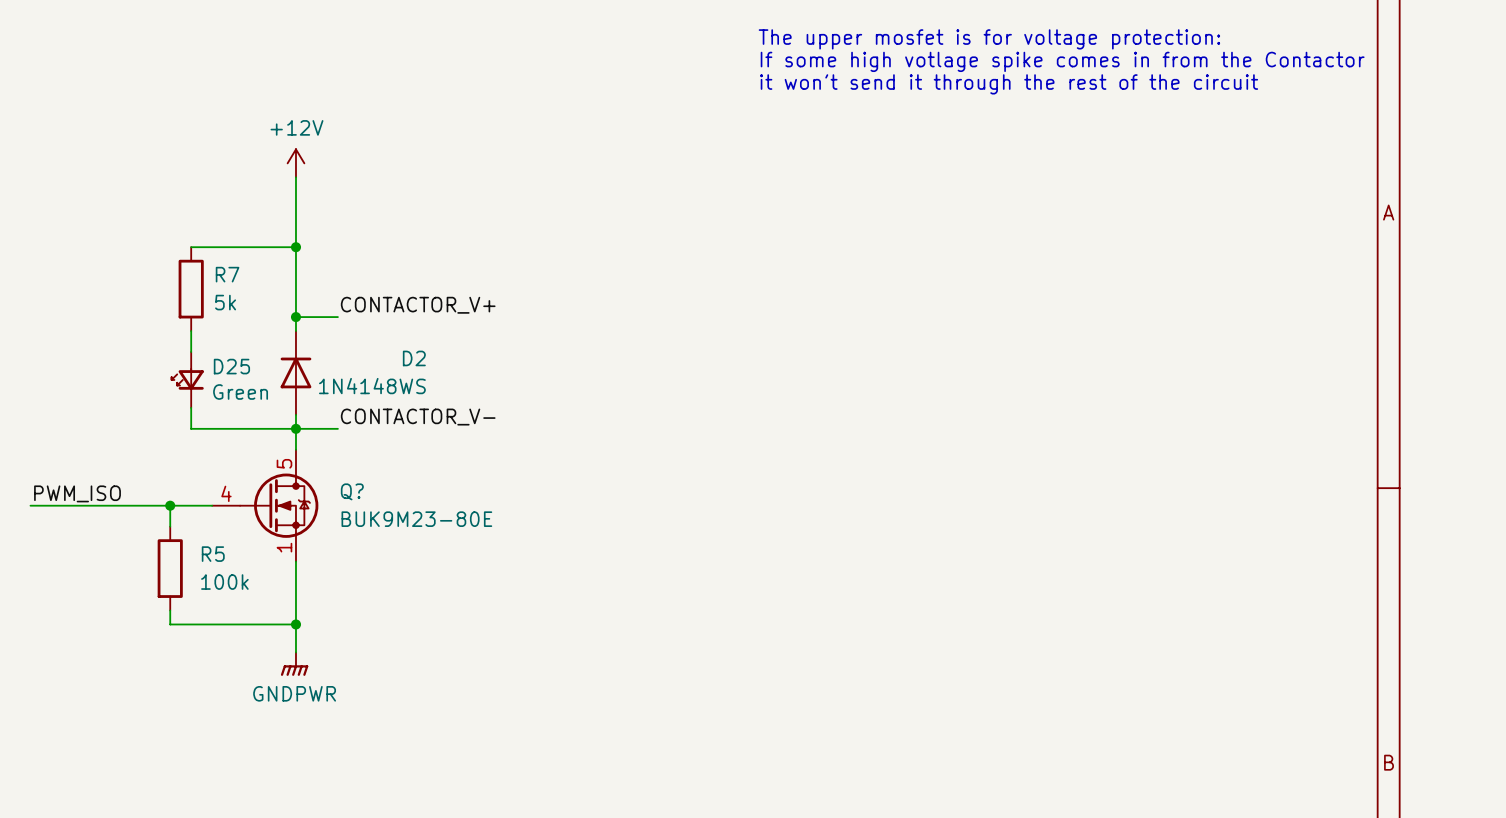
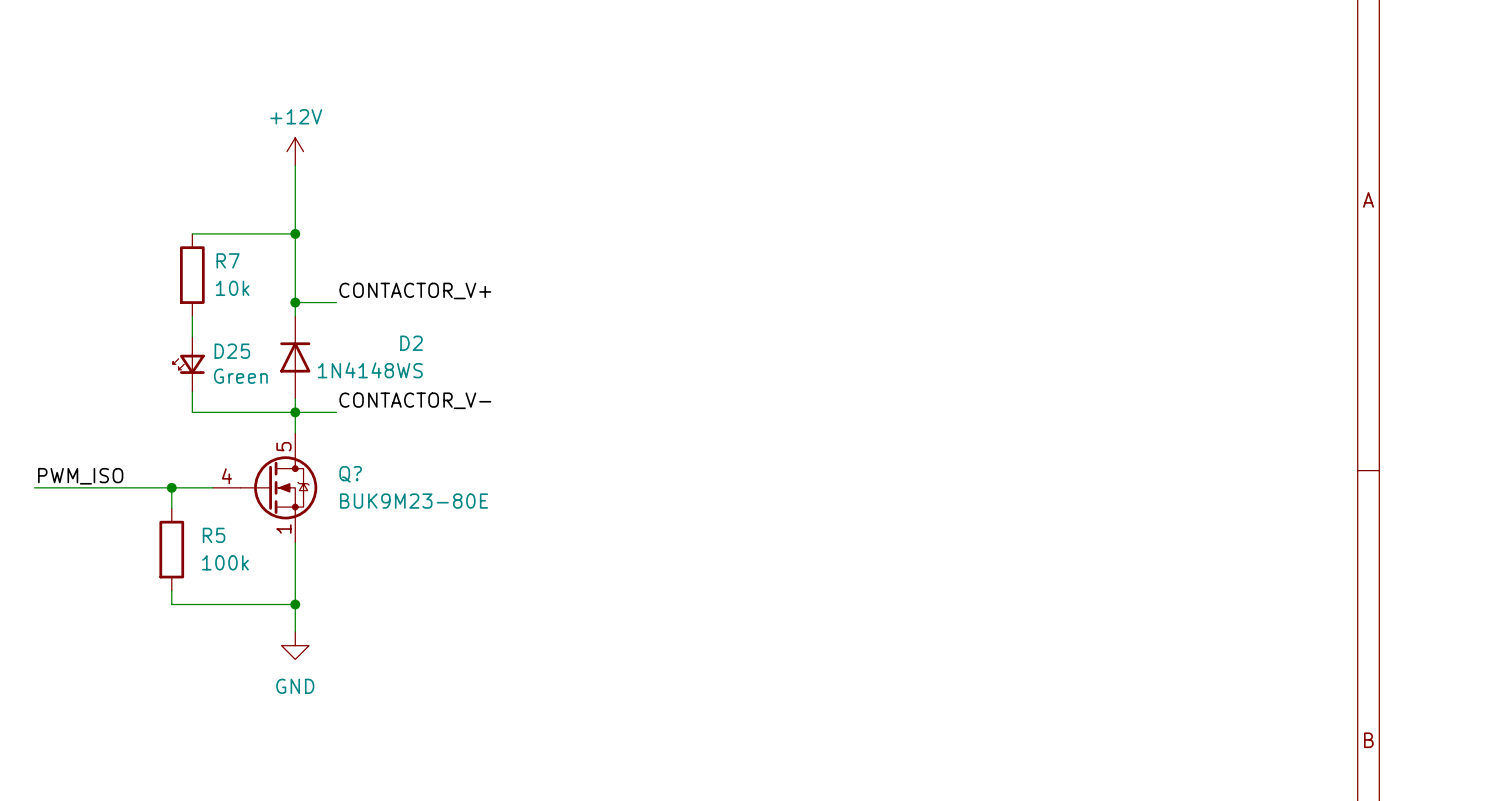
text: The upper mosfet is for voltage protection: (989, 39) -> none
text: If some high votlage spike comes in from the Contactor (1062, 61) -> none
text: it won't send it through the rest of the circuit (1009, 84) -> none
R7 value: 5k (225, 302) -> 10k (232, 288)
power symbol: GNDPWR (294, 664) -> GND (295, 645)

